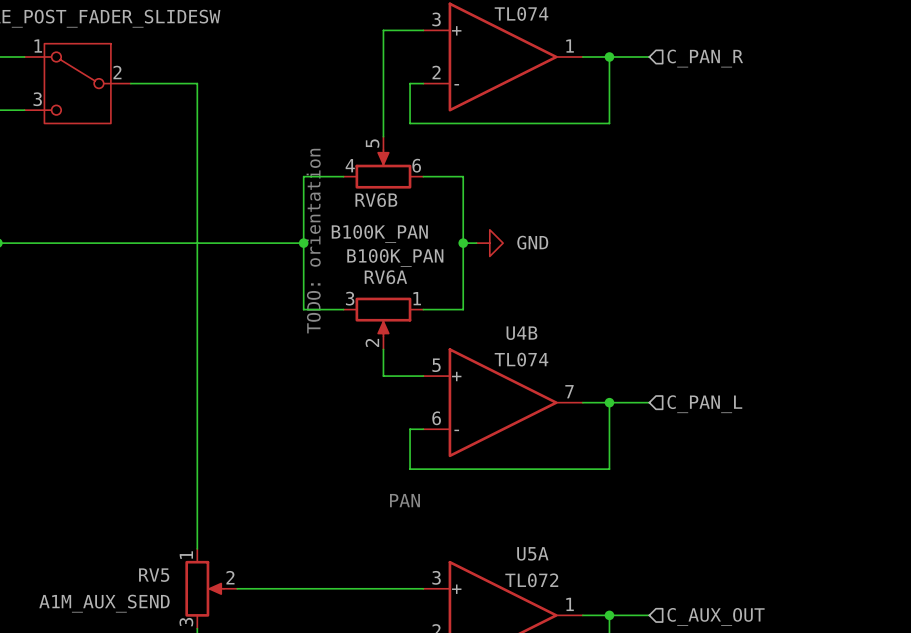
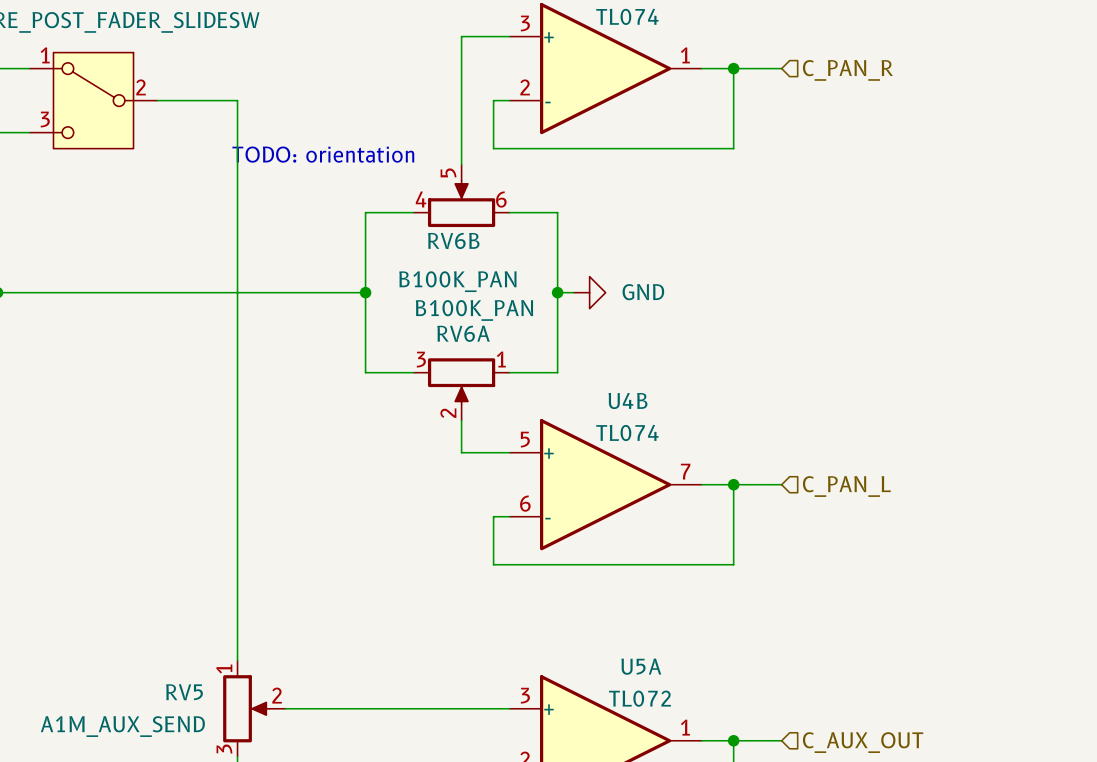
text rotation: 0° (313, 241) -> 90° clockwise (323, 154)
text: PAN (404, 500) -> none

